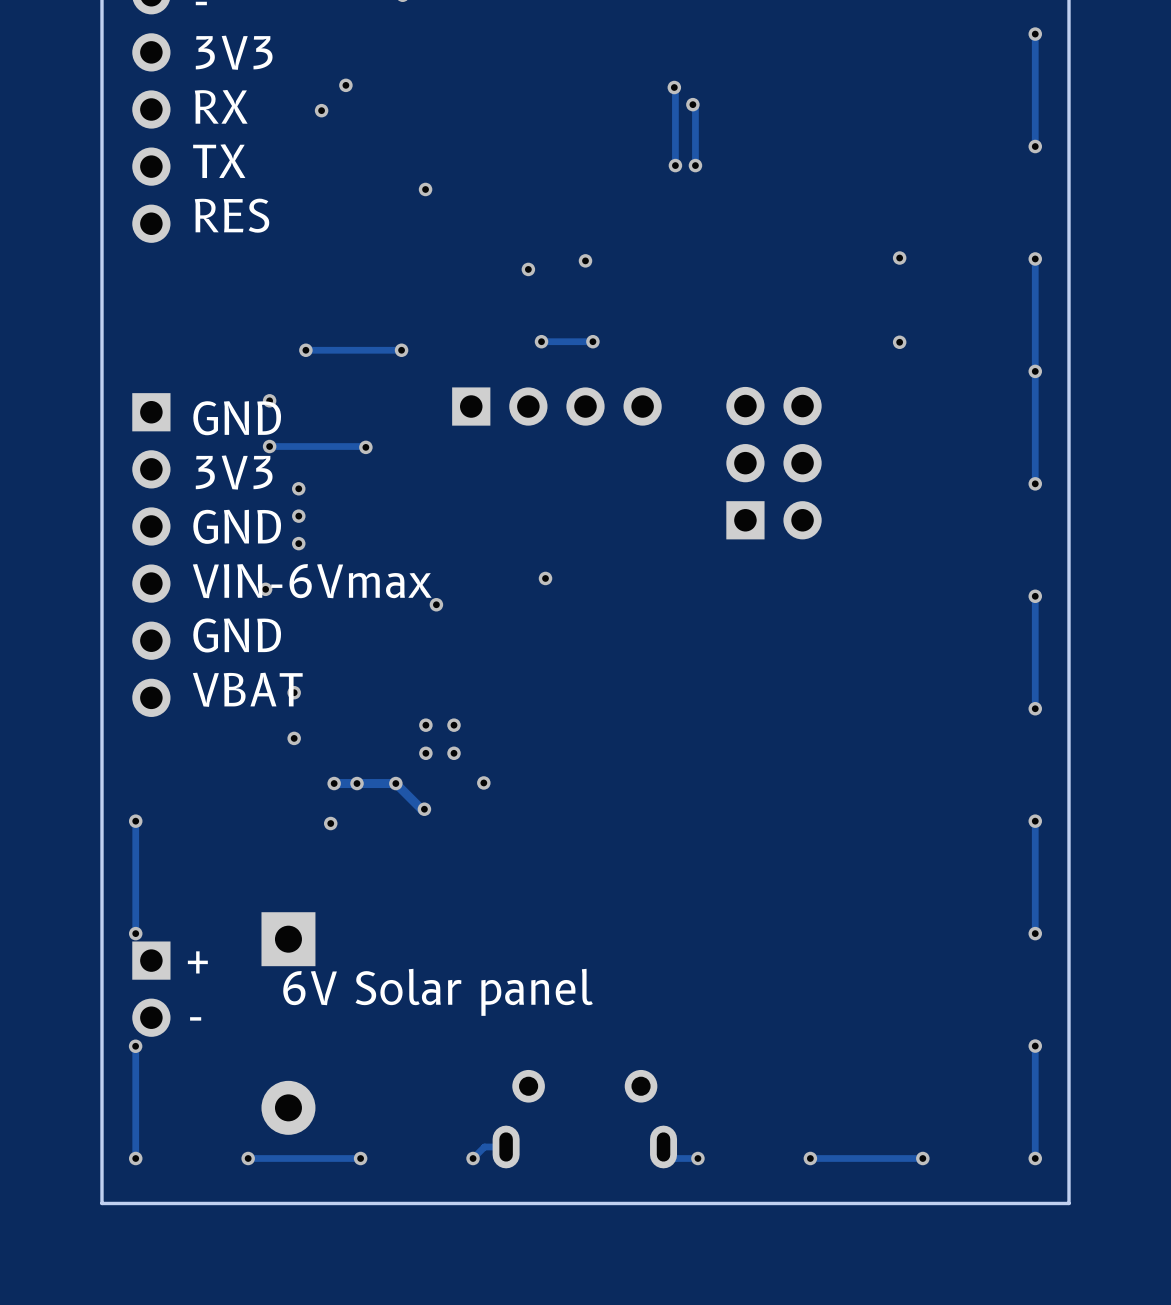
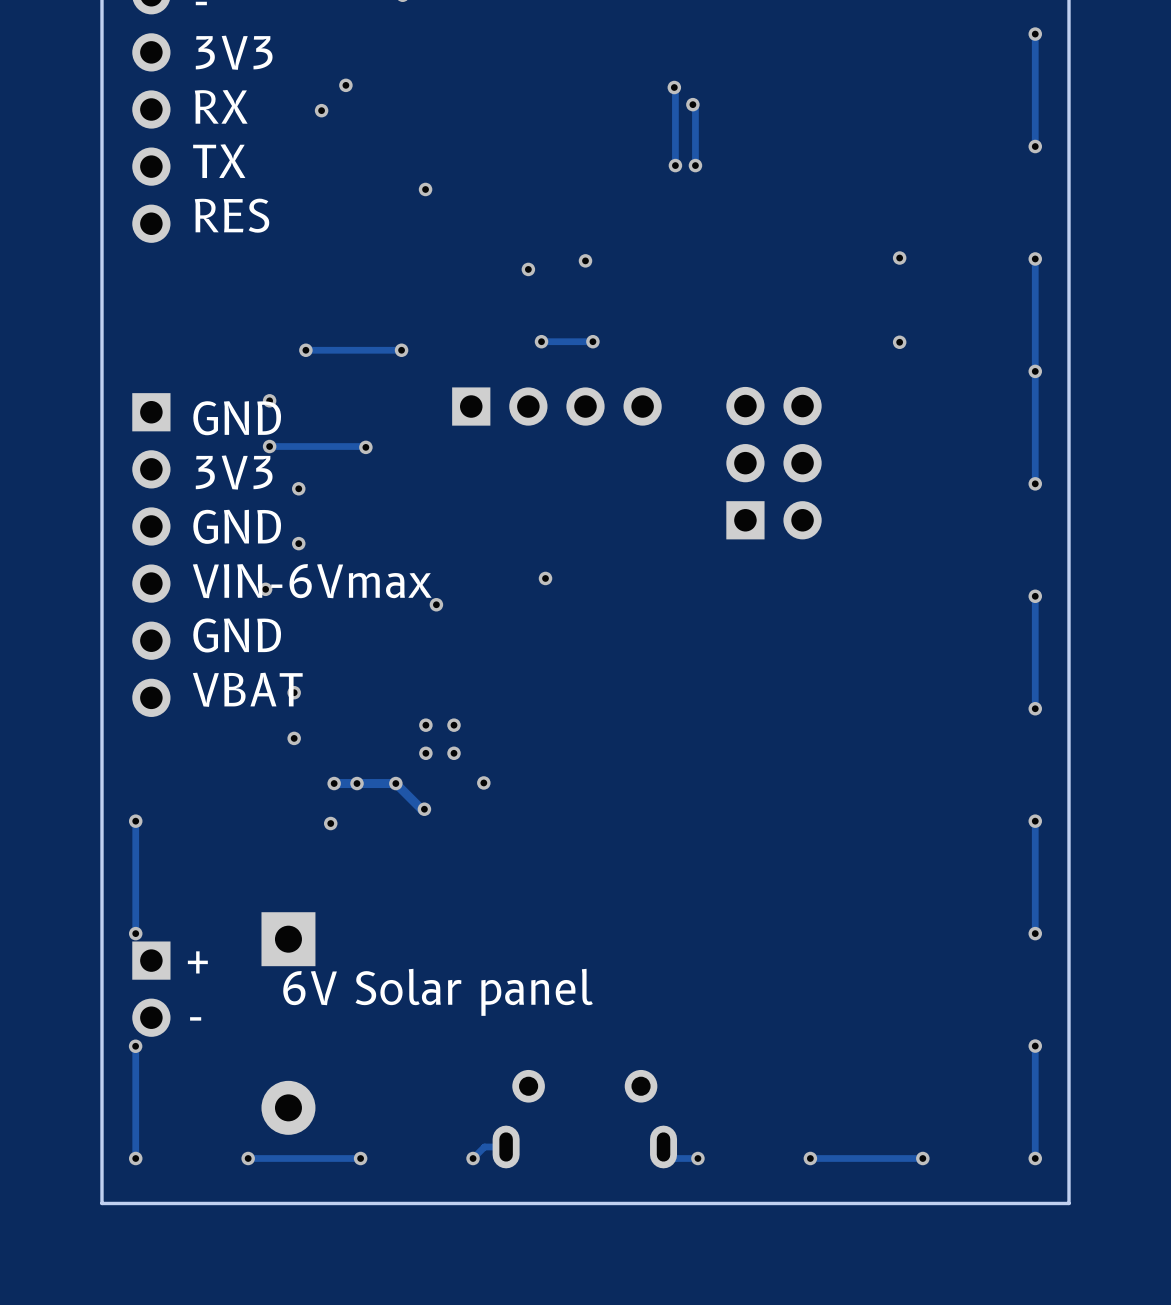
via: (298, 516) -> none

